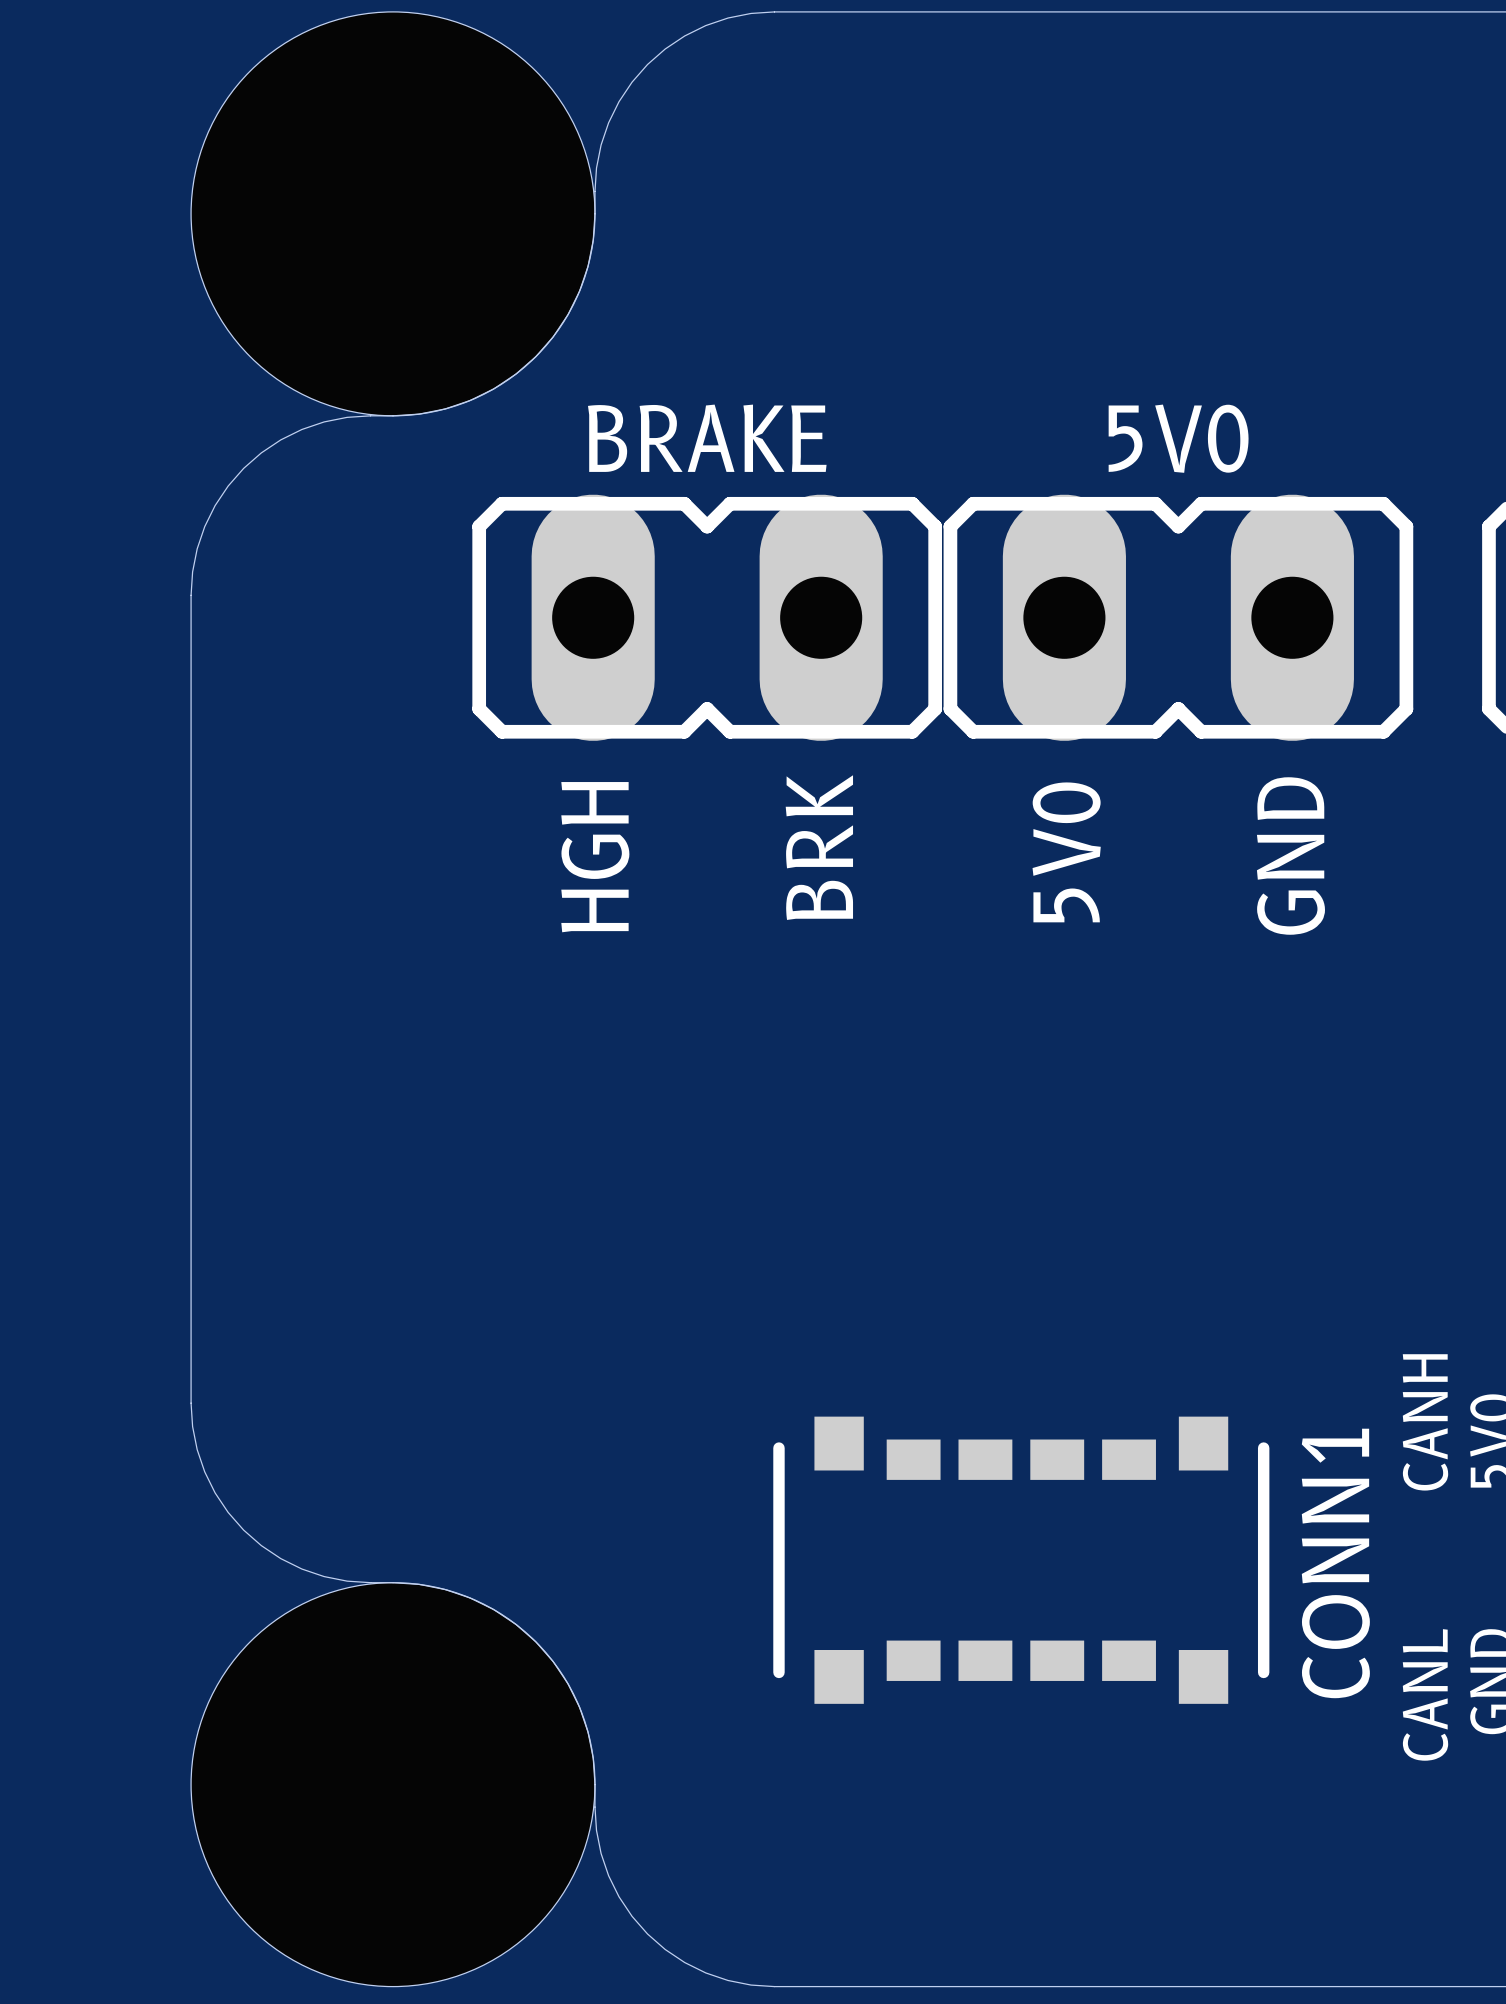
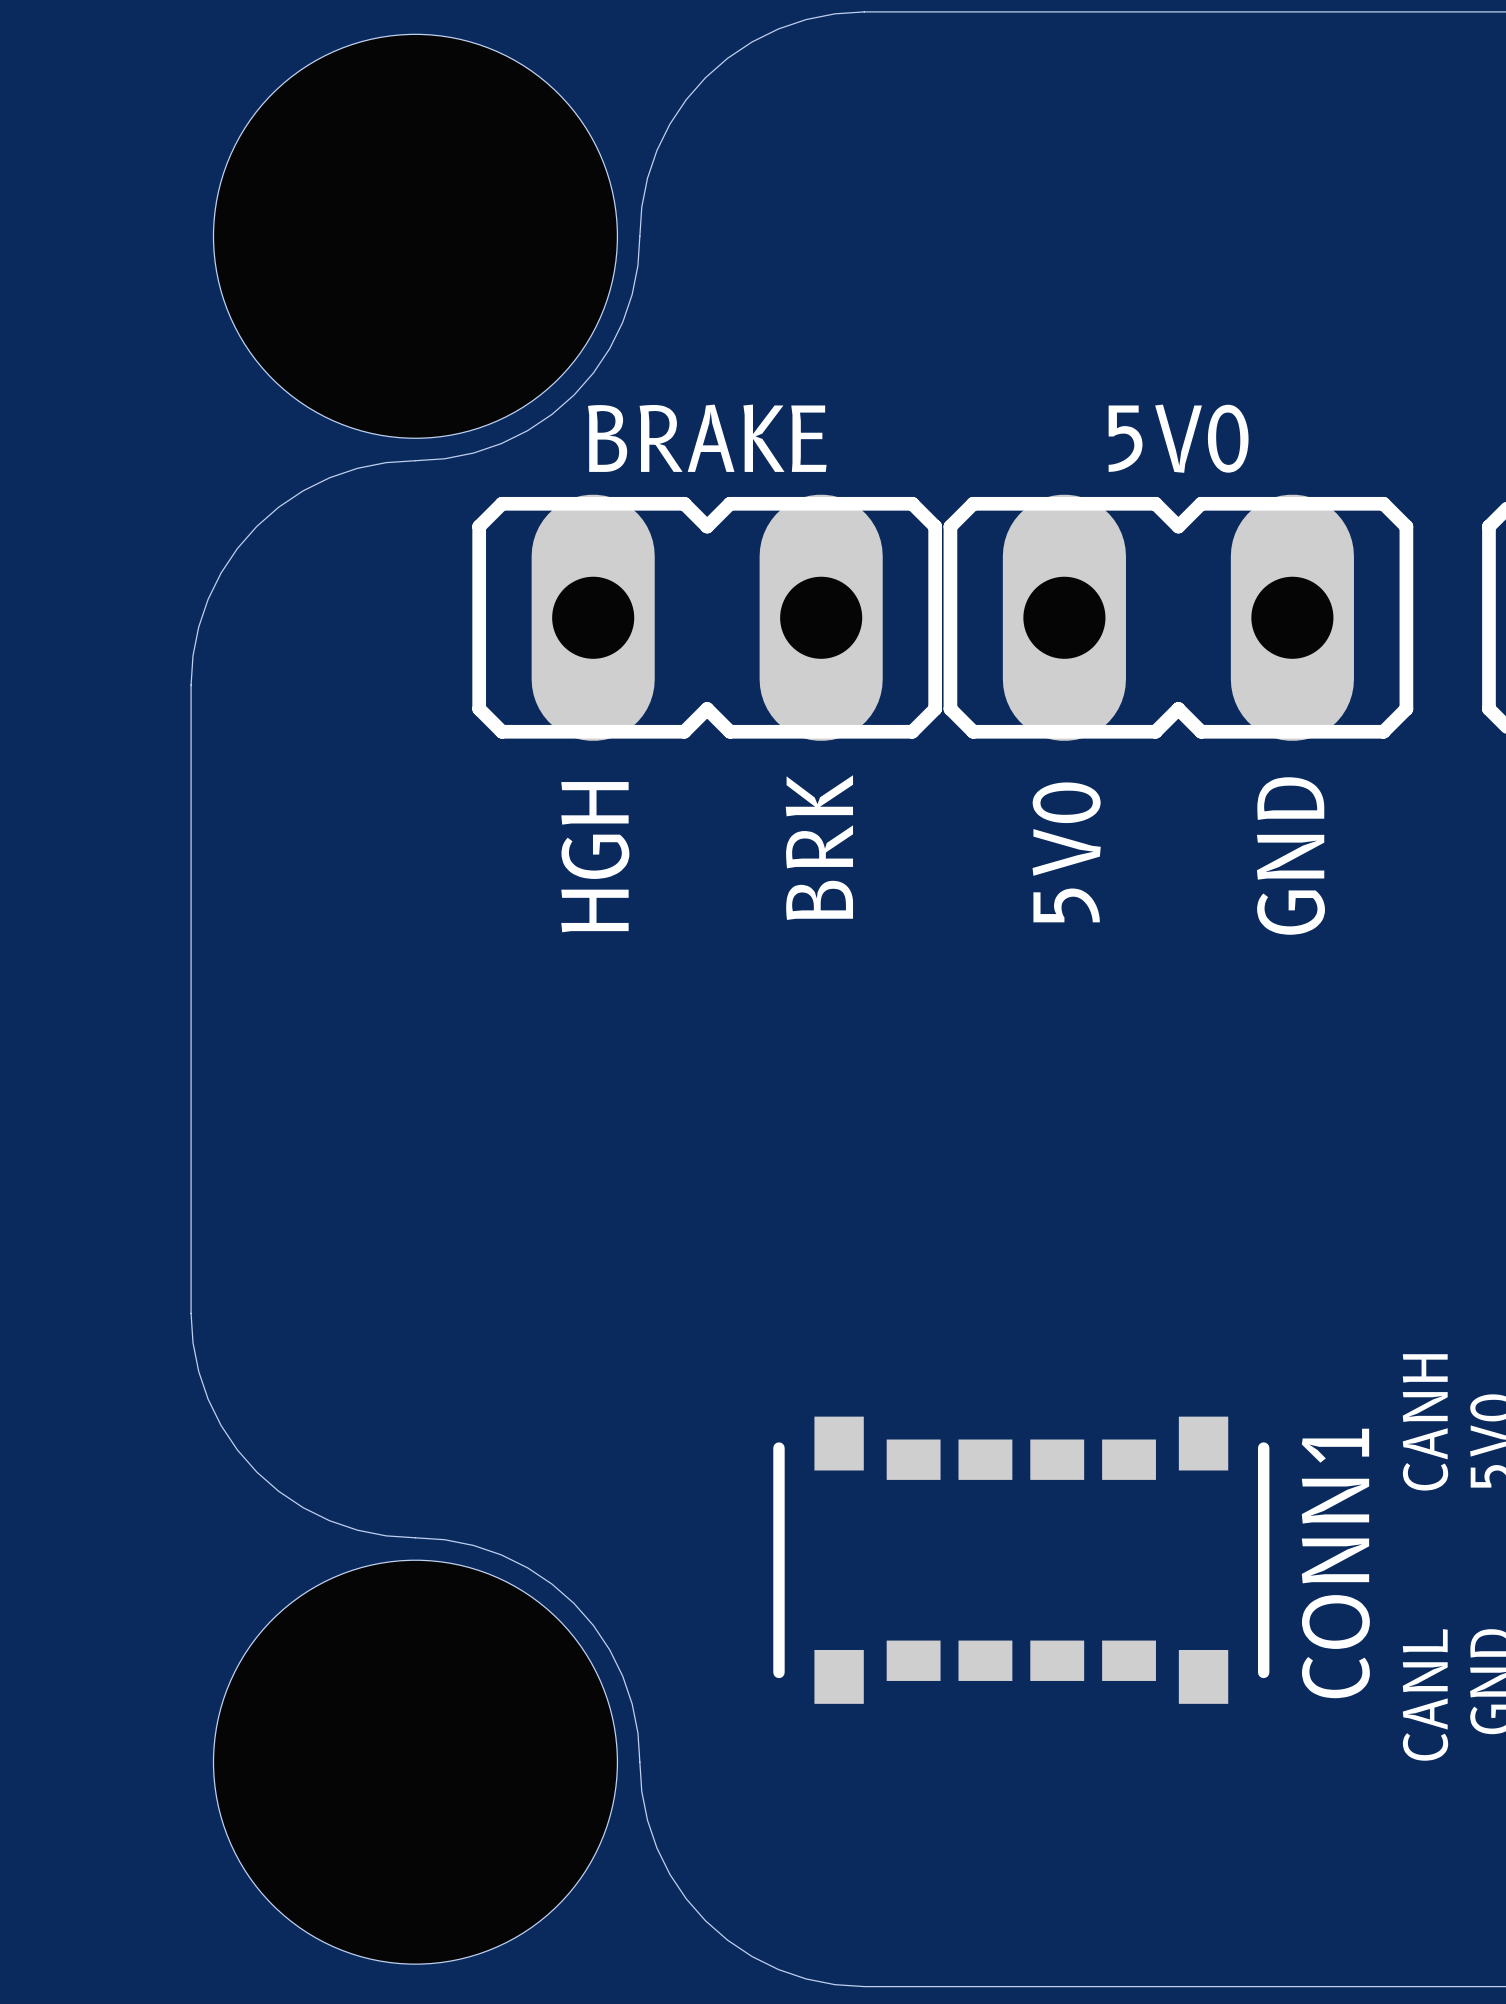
board edge: (864, 11) (751, 13) (728, 18) (705, 25) (684, 35) (665, 49) (647, 64) (632, 82) (619, 101) (608, 122) (601, 144) (596, 167) (593, 240) (588, 266) (579, 291) (567, 314) (553, 336) (535, 356) (515, 374) (494, 388) (470, 400) (445, 408) (419, 414) (347, 417) (324, 421) (301, 429) (280, 439) (261, 452) (243, 468) (228, 486) (215, 505) (204, 526) (197, 548) (192, 571) (191, 595) (191, 685) -> (864, 11) (834, 13) (806, 19) (778, 28) (752, 41) (727, 58) (705, 77) (686, 99) (669, 124) (656, 150) (647, 178) (641, 207) (637, 265) (632, 294) (622, 322) (609, 348) (593, 372) (574, 394) (552, 414) (527, 430) (501, 443) (473, 453) (444, 458) (386, 462) (357, 468) (329, 477) (303, 490) (278, 507) (256, 526) (237, 548) (221, 572) (208, 599) (198, 627) (192, 655) (191, 685)
hole position: (393, 213) -> (415, 236)
board edge: (191, 1313) (192, 1426) (197, 1449) (204, 1471) (215, 1492) (228, 1512) (243, 1530) (261, 1545) (280, 1558) (301, 1569) (324, 1576) (347, 1581) (419, 1584) (445, 1589) (470, 1598) (494, 1609) (515, 1624) (535, 1641) (553, 1661) (567, 1683) (579, 1707) (588, 1732) (593, 1758) (596, 1830) (601, 1853) (608, 1875) (619, 1896) (632, 1916) (647, 1934) (665, 1949) (684, 1962) (705, 1972) (728, 1980) (751, 1985) (774, 1986) (864, 1986) -> (191, 1313) (192, 1342) (198, 1371) (208, 1399) (221, 1425) (237, 1450) (256, 1472) (278, 1491) (303, 1507) (329, 1520) (357, 1530) (386, 1535) (444, 1539) (473, 1545) (501, 1554) (527, 1567) (552, 1584) (574, 1603) (593, 1625) (609, 1650) (622, 1676) (632, 1704) (637, 1732) (641, 1791) (647, 1820) (656, 1848) (669, 1874) (686, 1898) (705, 1920) (727, 1940) (752, 1956) (778, 1969) (806, 1978) (834, 1984) (864, 1986)
hole position: (393, 1784) -> (415, 1762)

